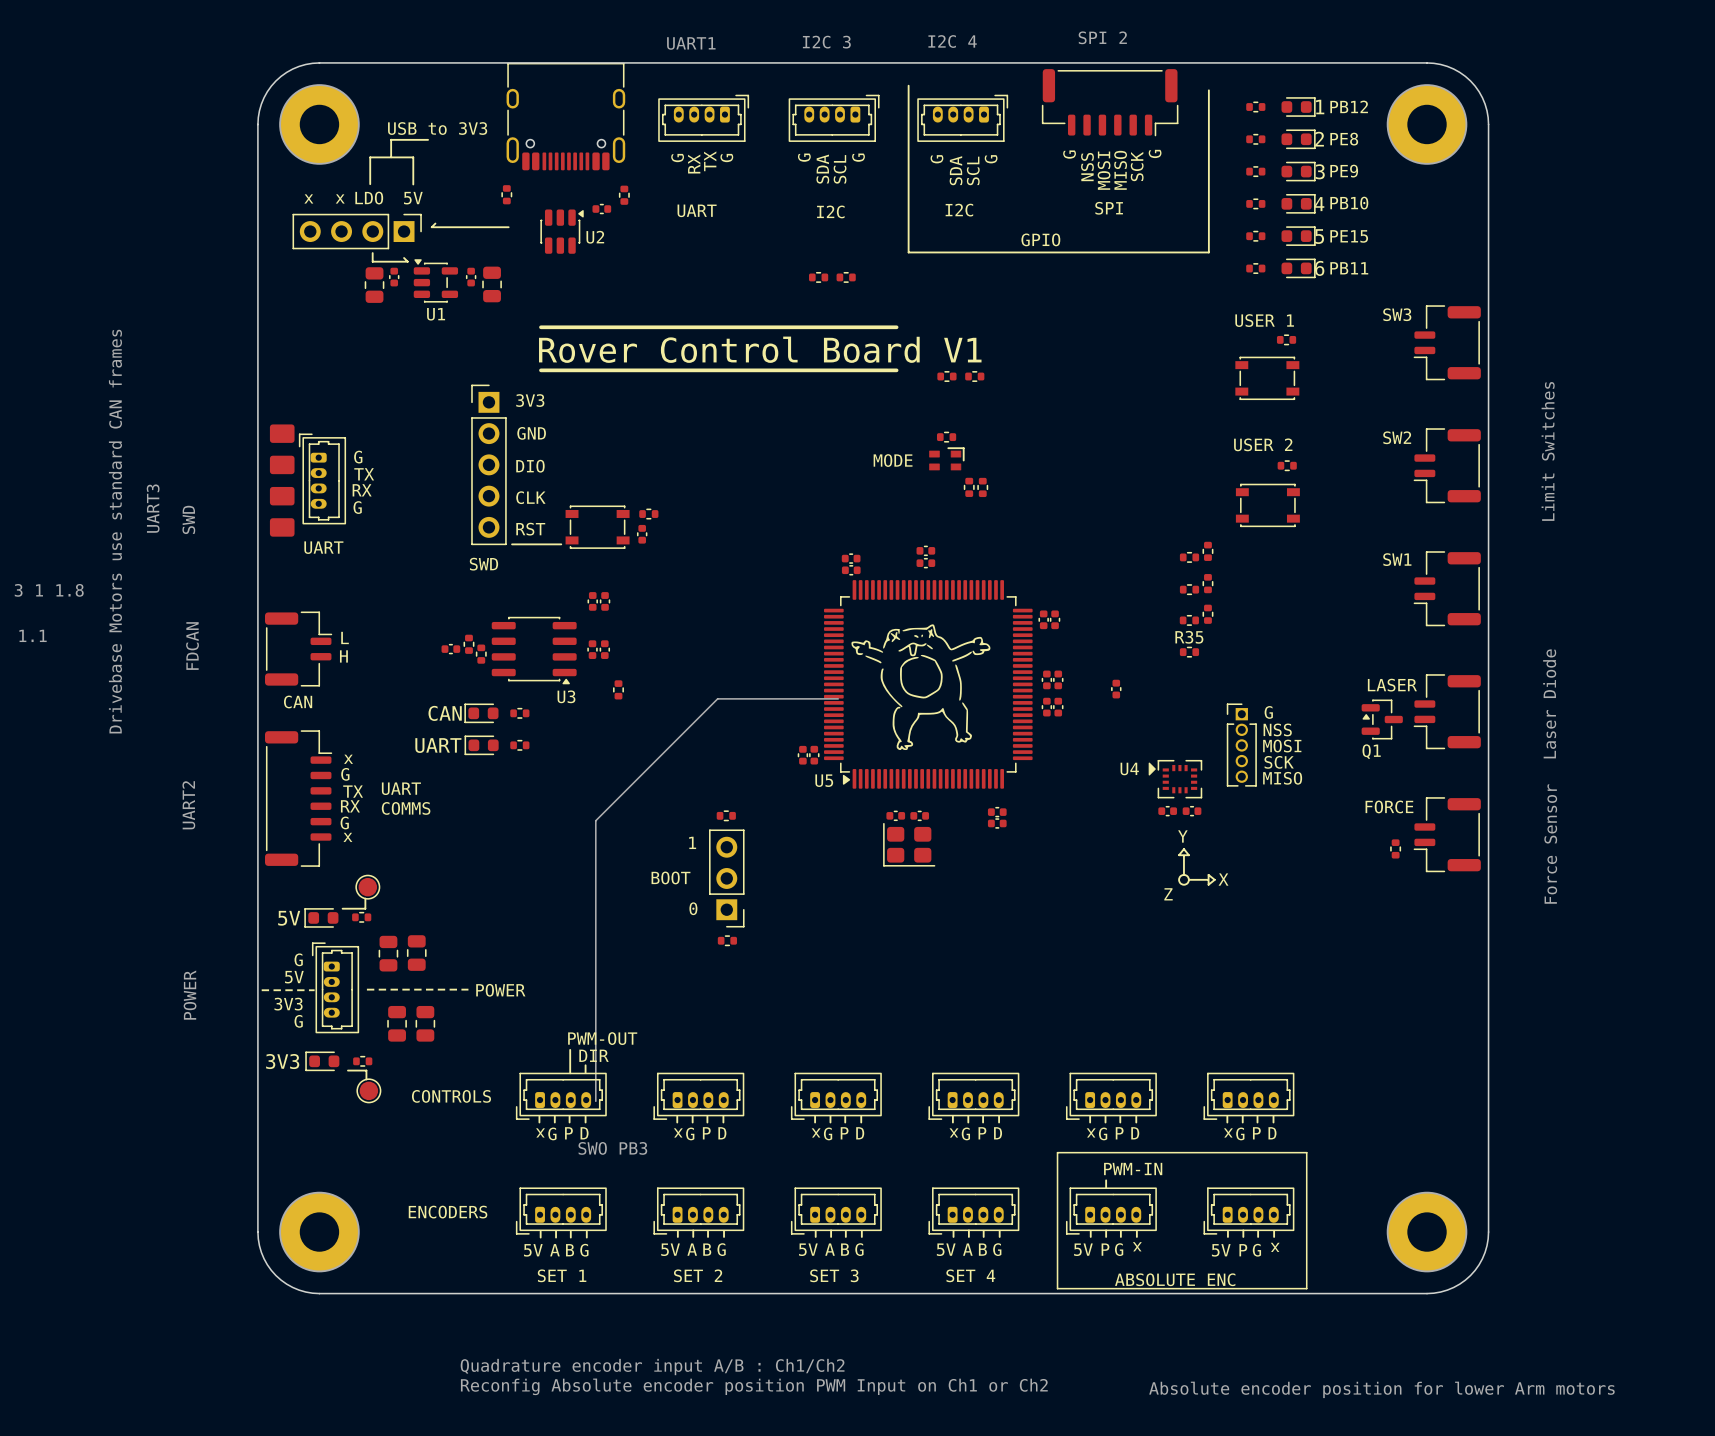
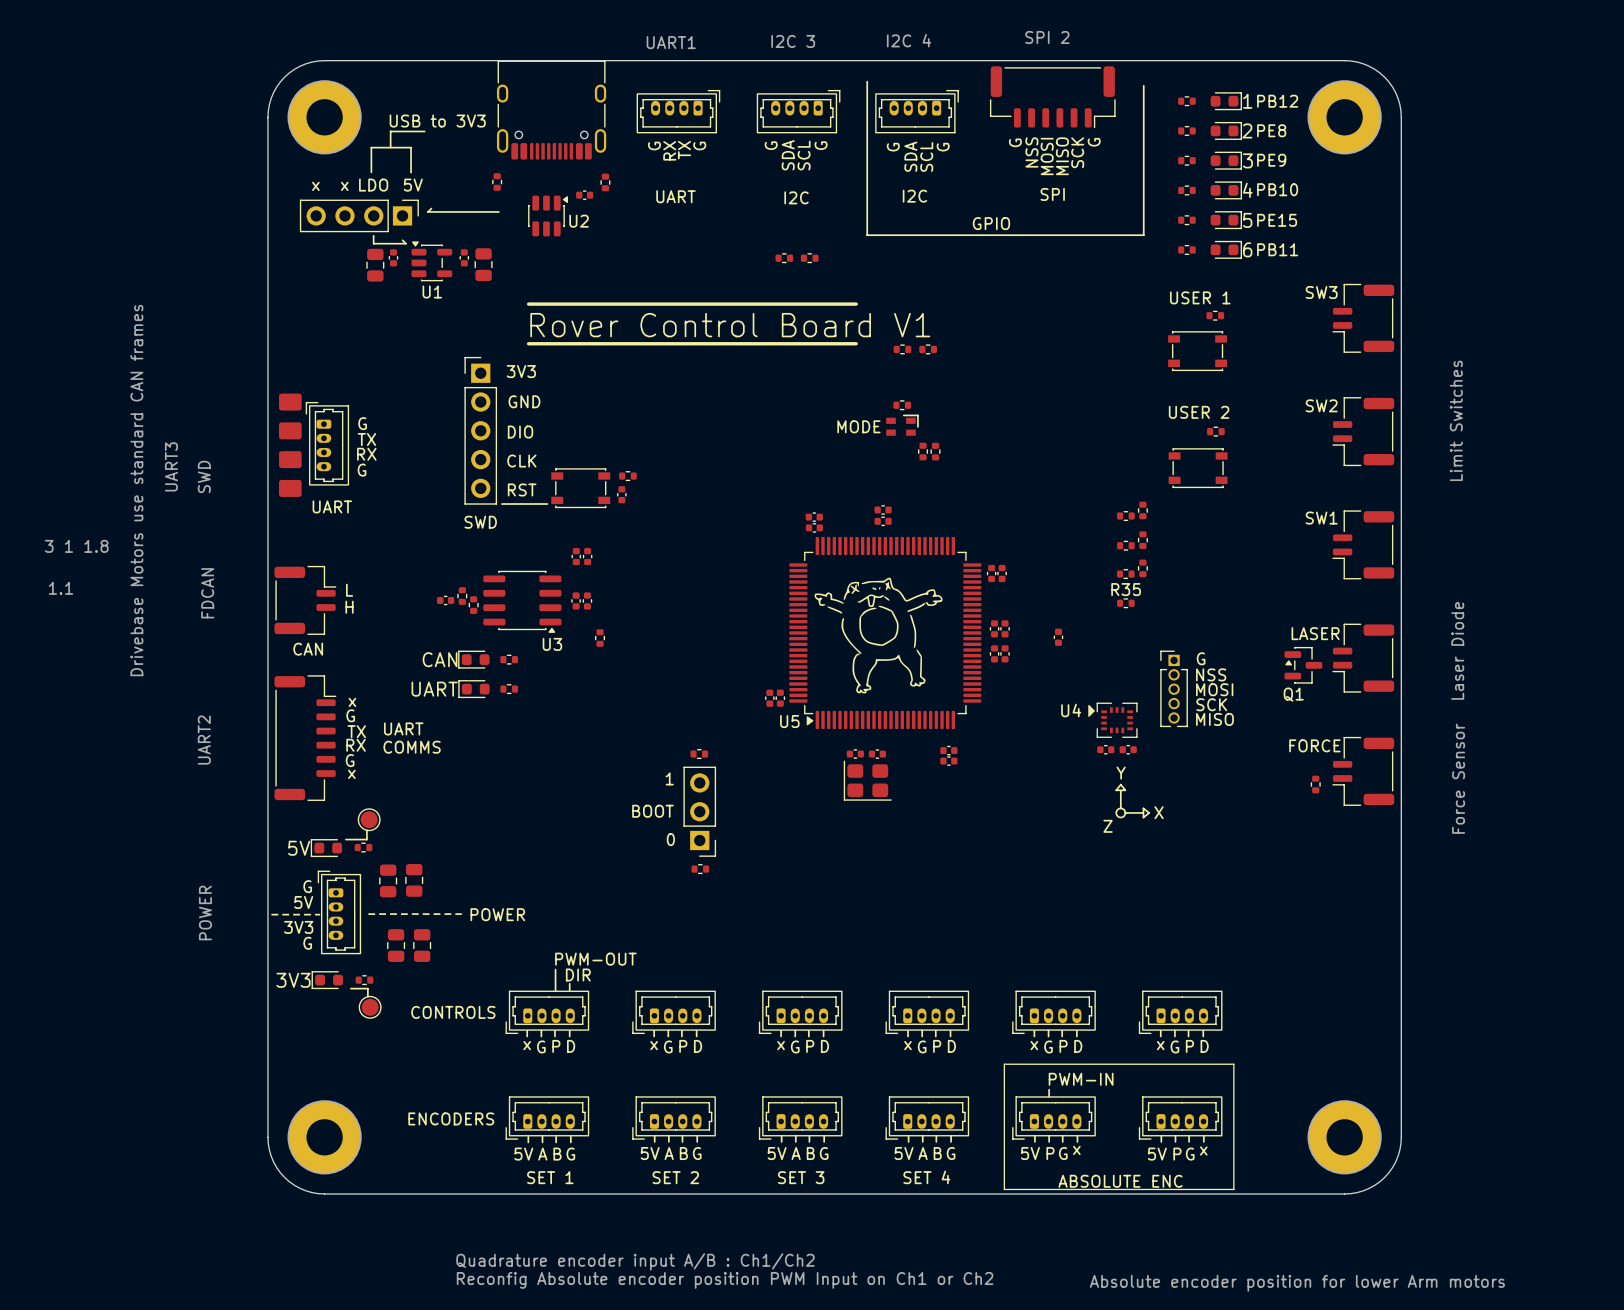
line: (838, 698) (717, 698) (595, 820) (595, 1101) -> none
text: SWO PB3 (612, 1148) -> none

